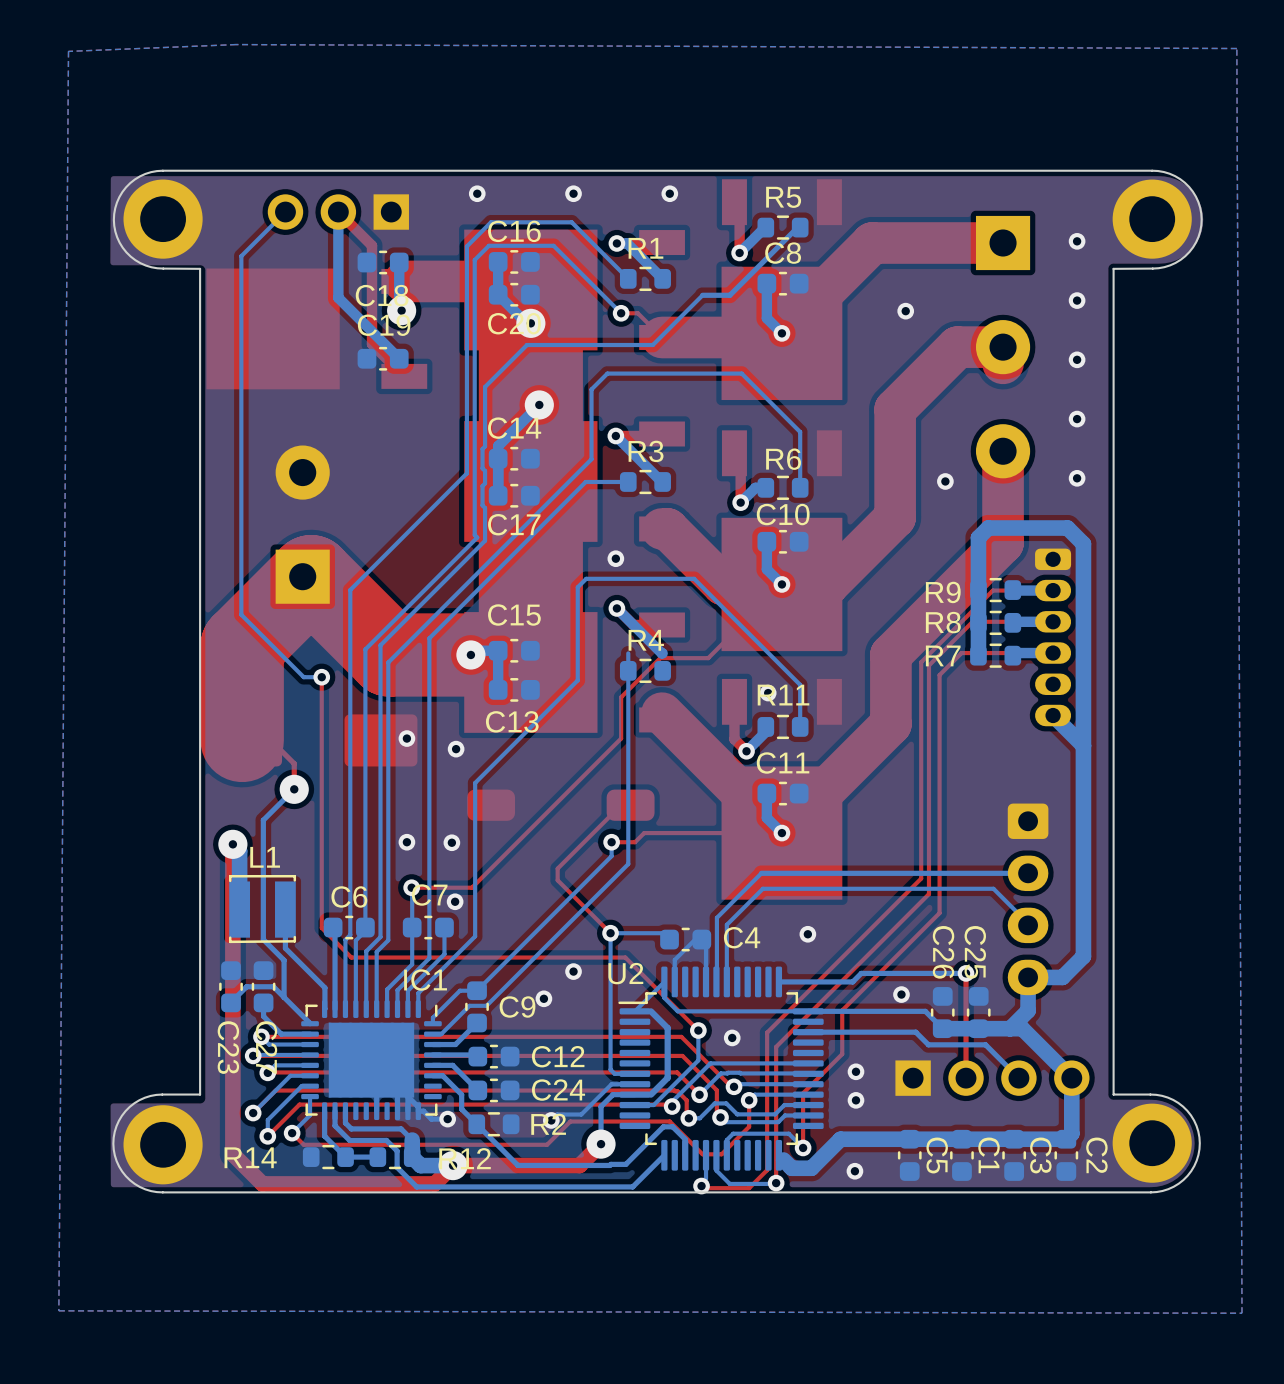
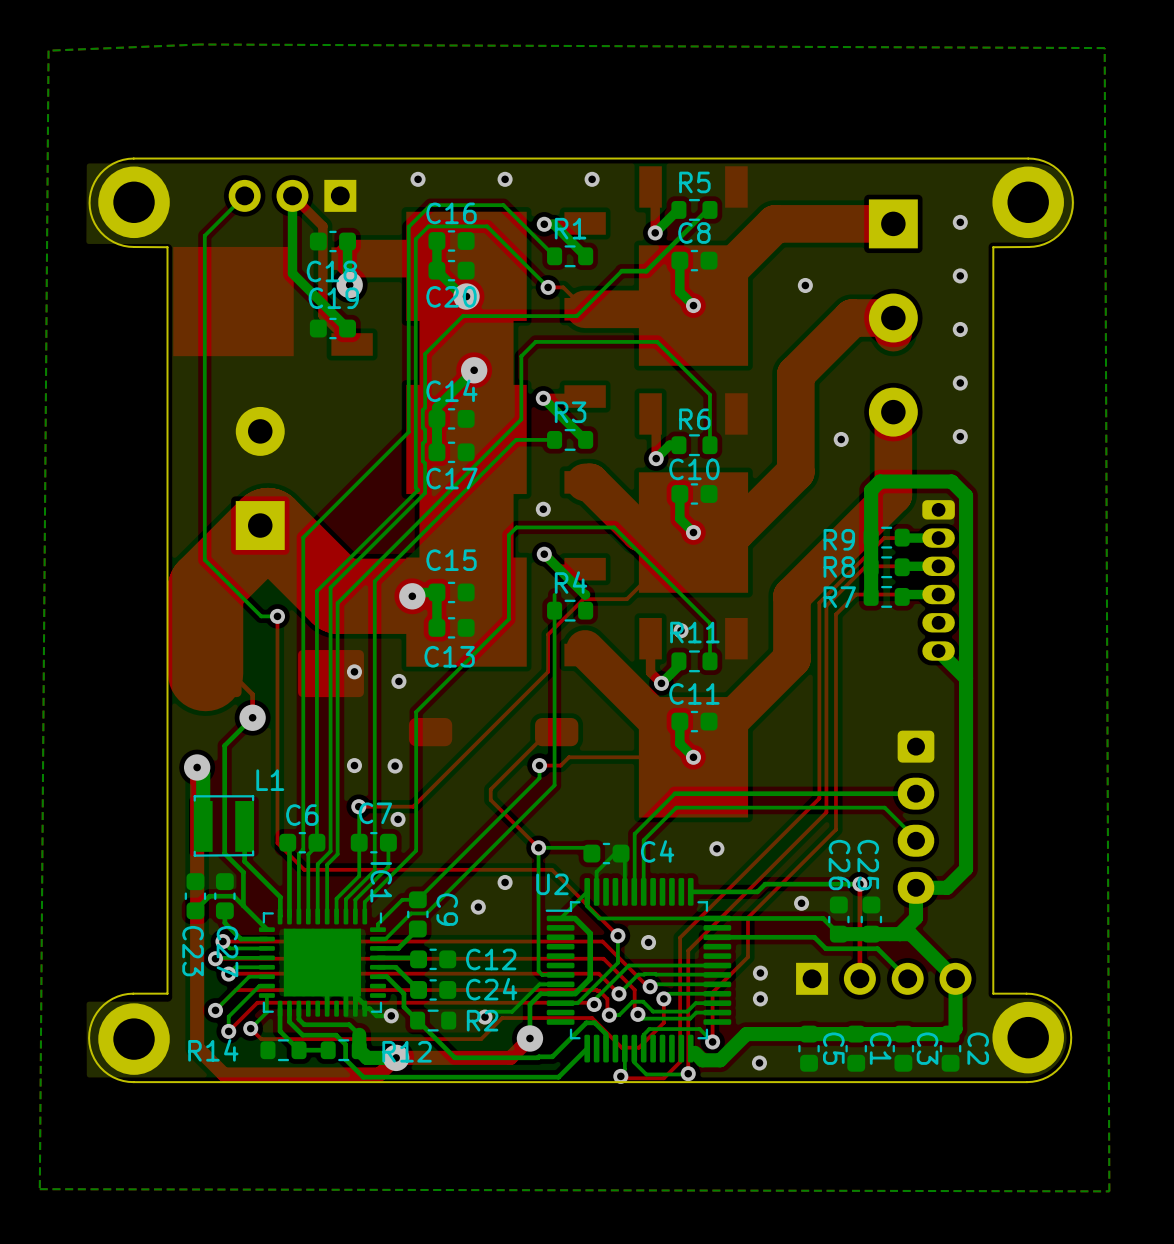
L1 name position: L1 (265, 857) -> L1 (270, 780)
IC1 name rotation: 0° (425, 980) -> 90° clockwise (381, 882)
C9 name rotation: 0° (517, 1007) -> 90° clockwise (447, 909)

